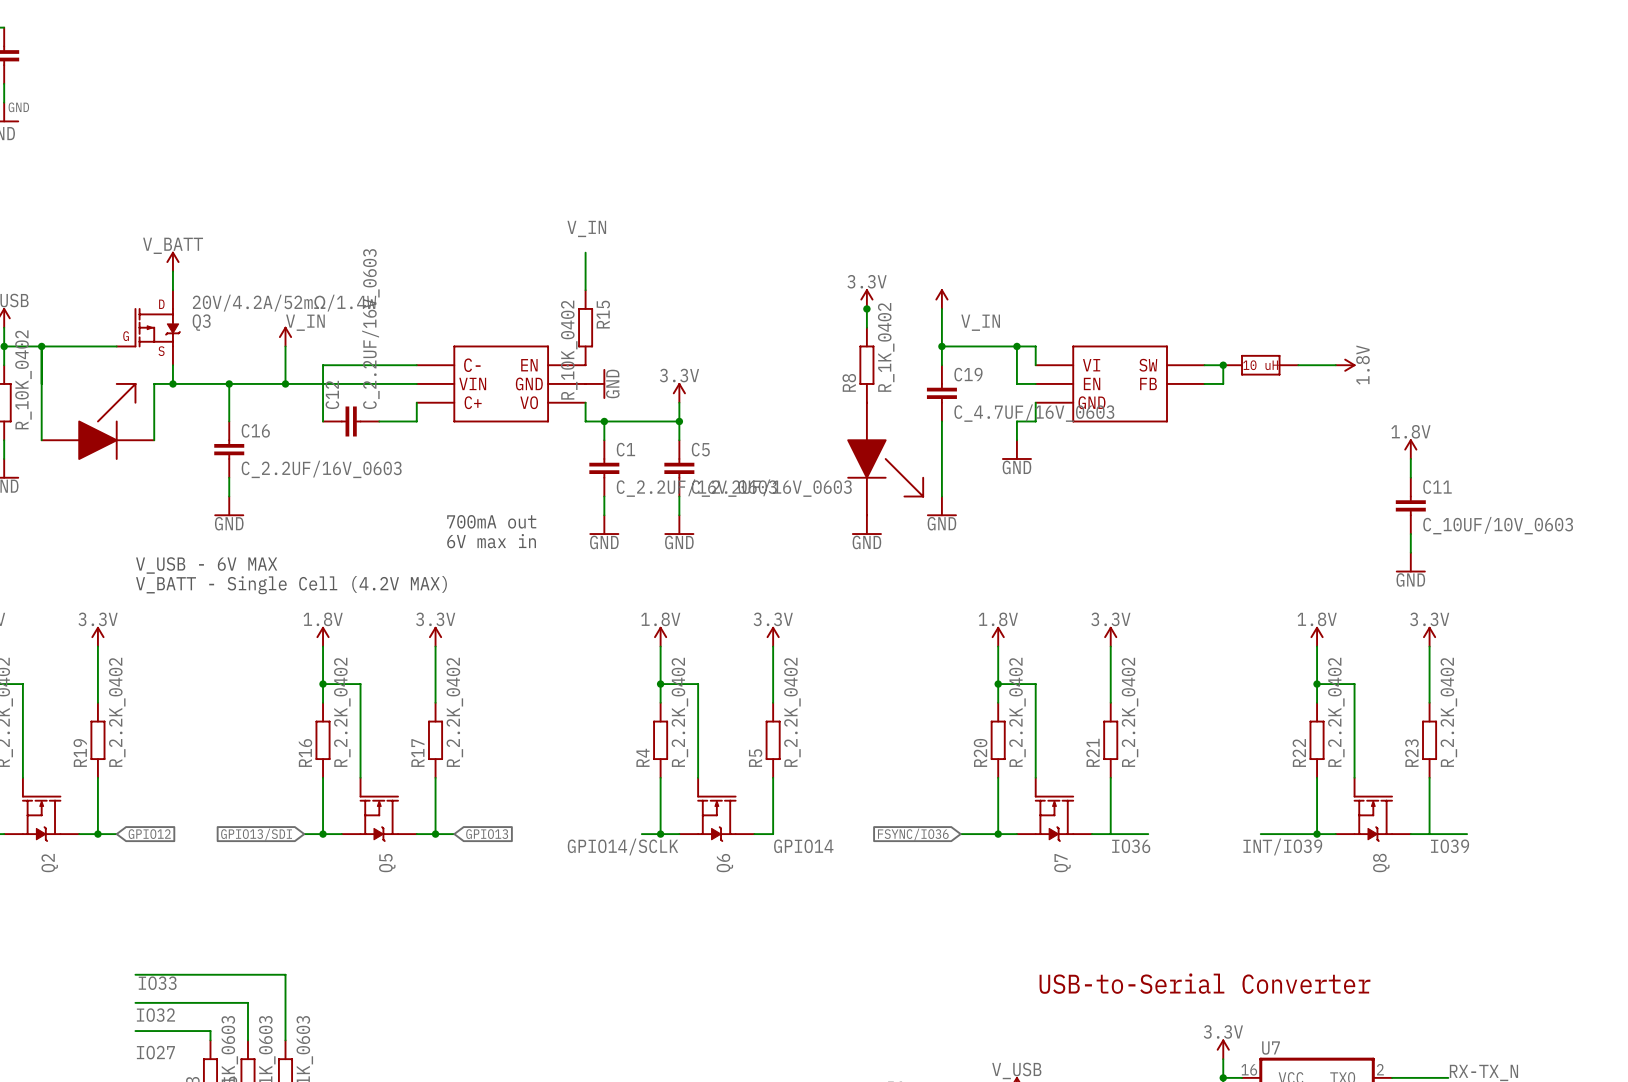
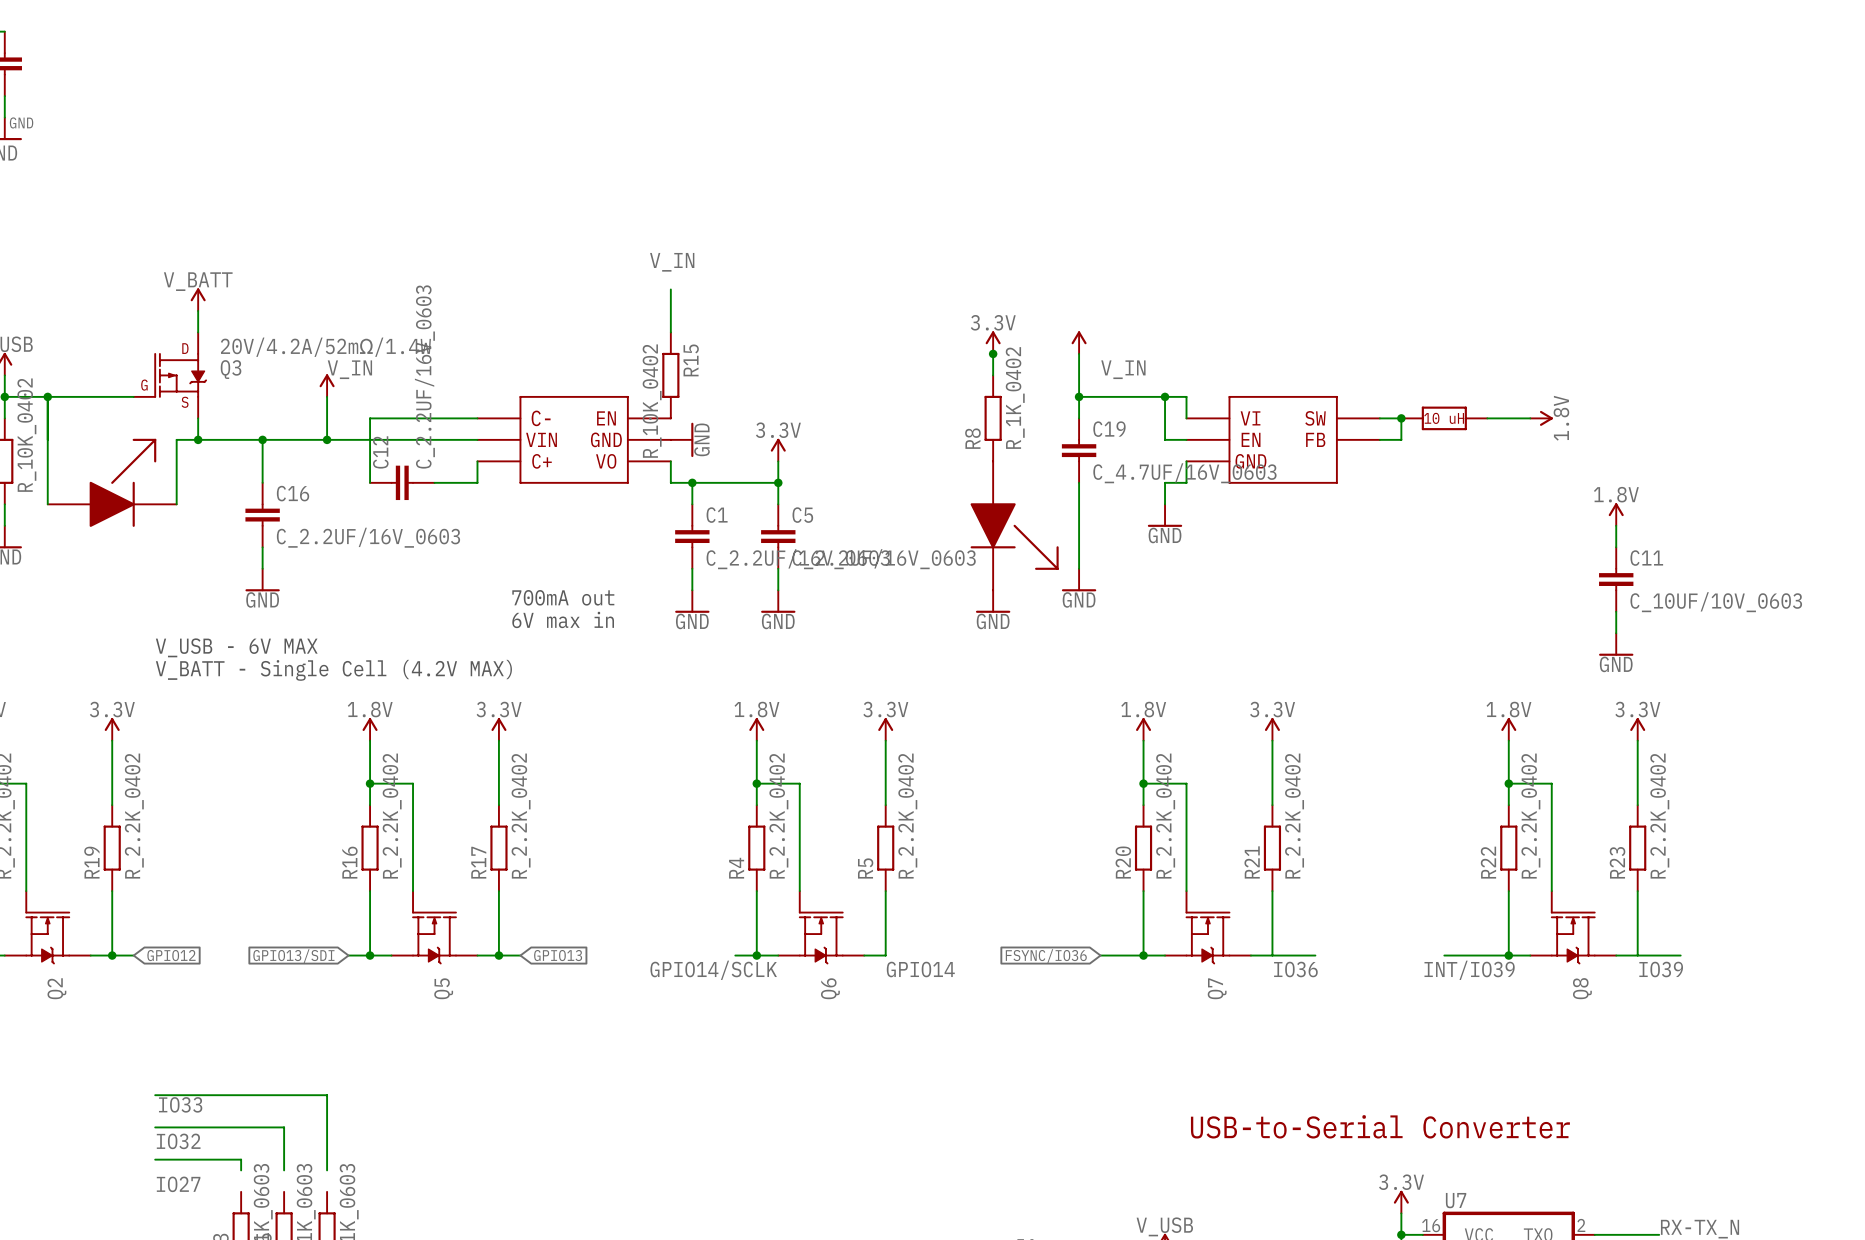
wire: (135, 974) (285, 974) -> (155, 1095) (327, 1095) (327, 1116)
label position: IO33 (157, 983) -> IO33 (180, 1104)
wire: (135, 1002) (248, 1002) -> (155, 1127) (284, 1127) (284, 1148)
label position: IO32 (155, 1015) -> IO32 (178, 1141)
wire: (248, 1021) (248, 1040) -> none
wire: (285, 1021) (285, 1040) -> none
wire: (135, 1031) (210, 1031) (210, 1040) -> (155, 1159) (241, 1159) (241, 1170)
label position: IO27 (155, 1052) -> IO27 (178, 1184)

